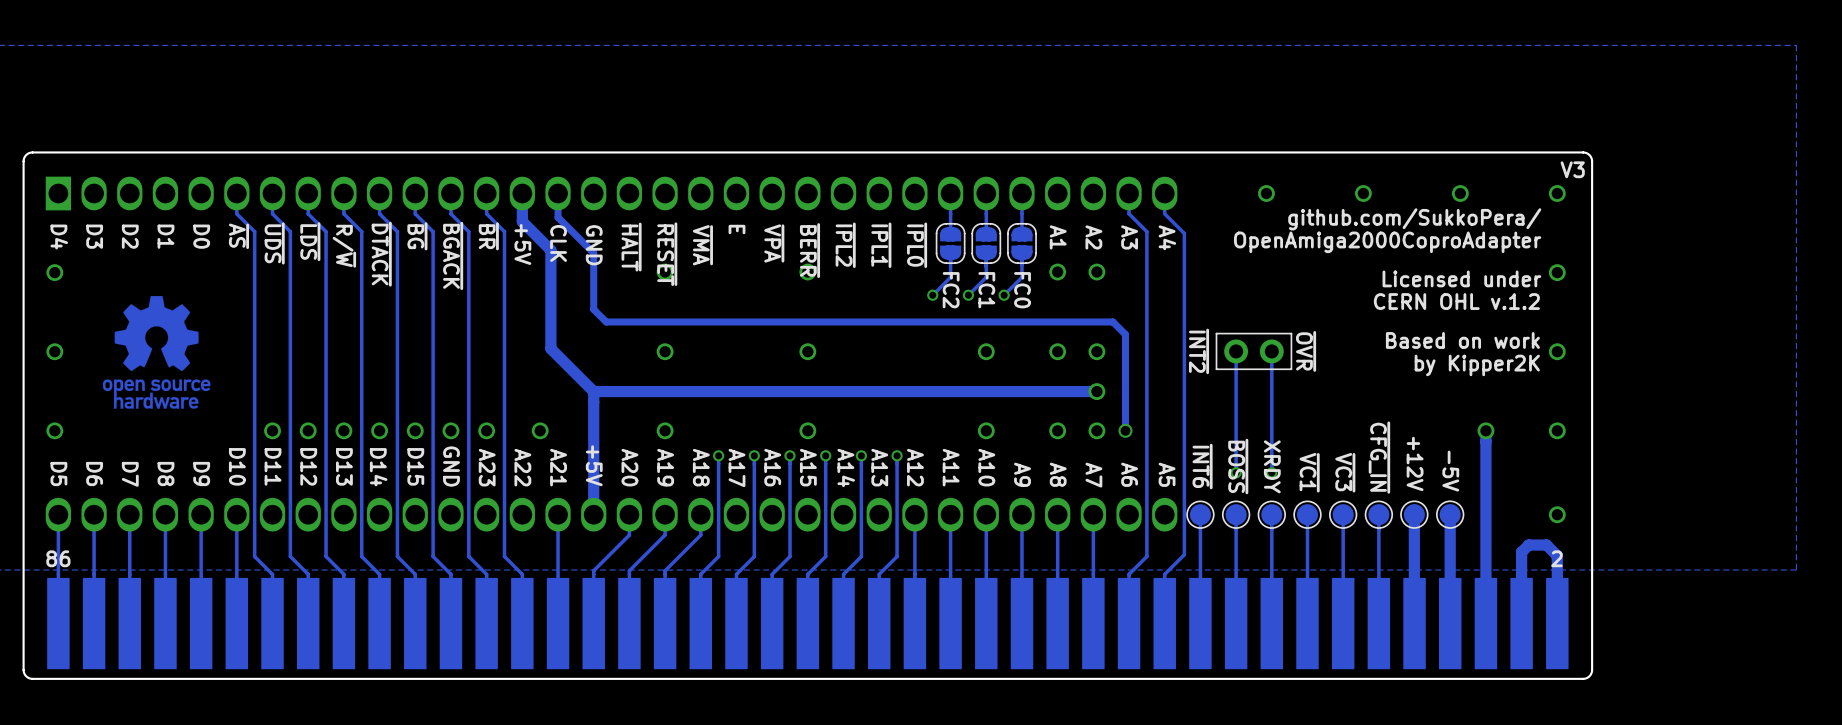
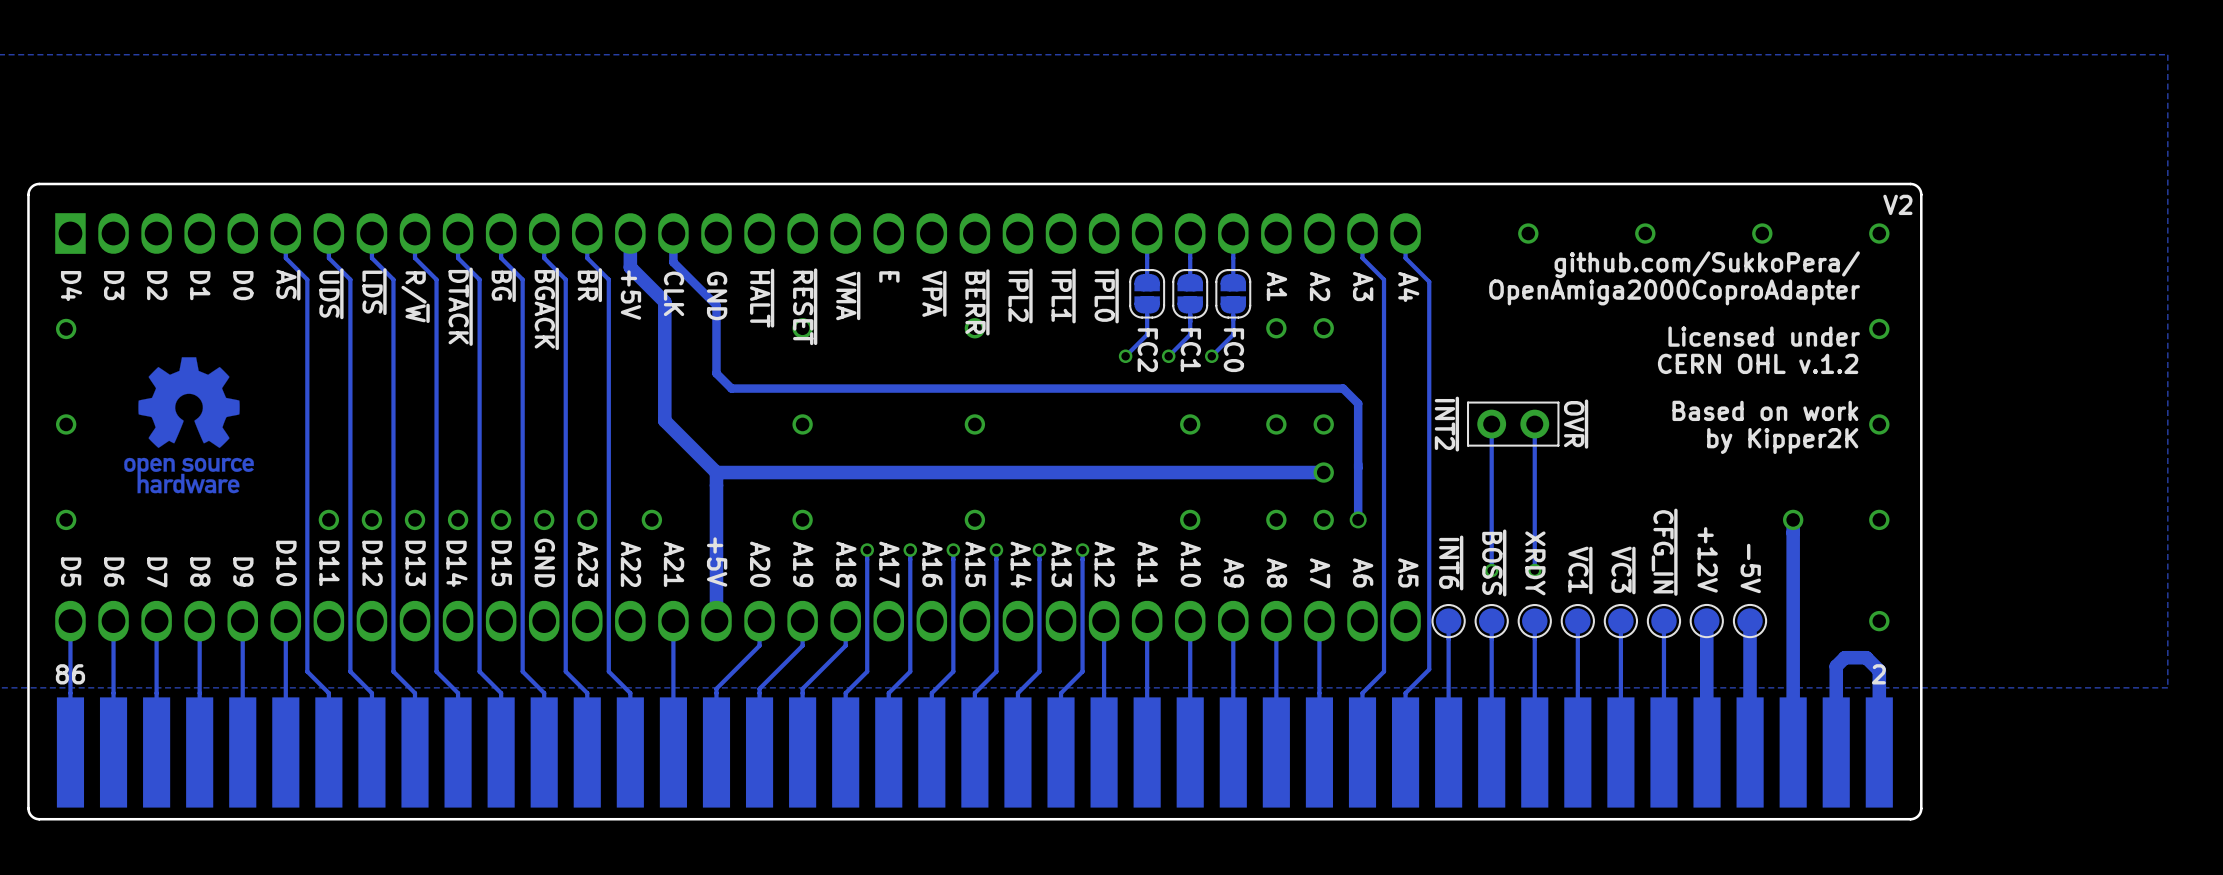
text: V3 (1572, 169) -> V2 (1897, 204)

